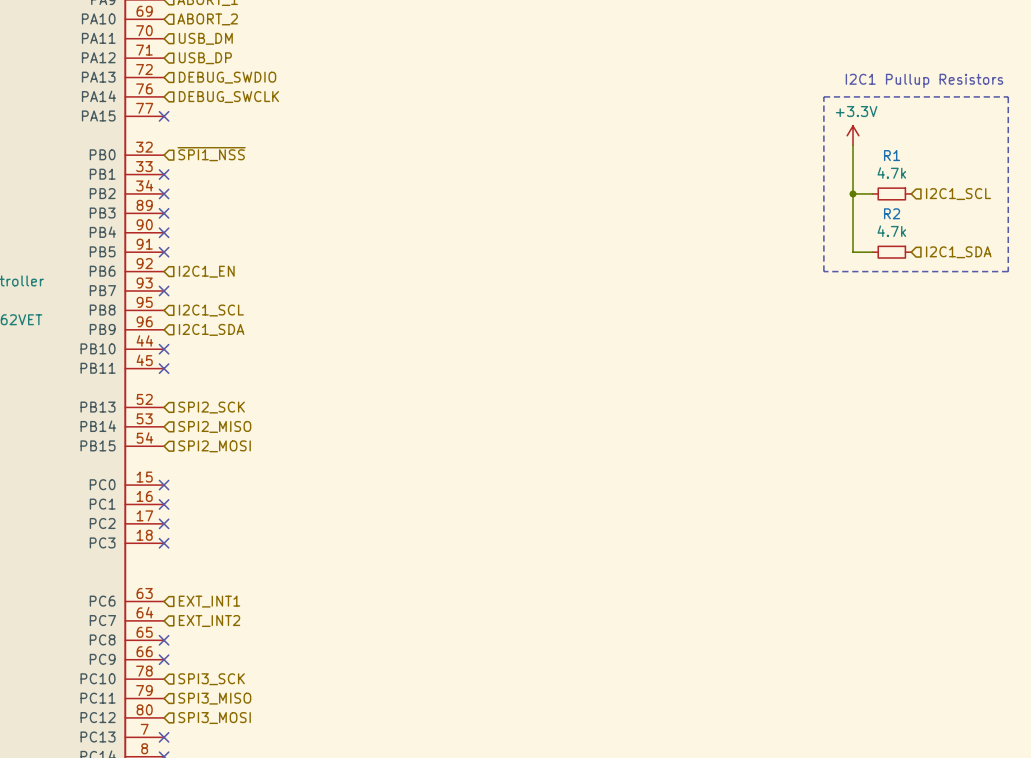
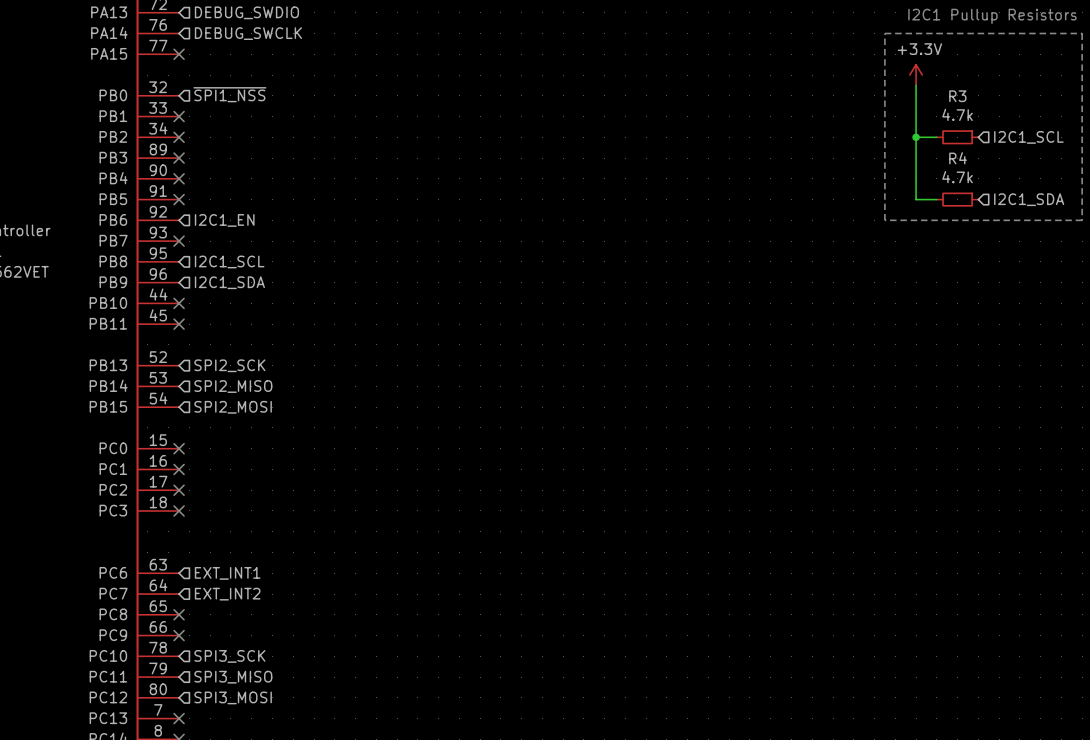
R1 name: R1 (892, 155) -> R3 (957, 96)
R2 name: R2 (892, 213) -> R4 (958, 158)

